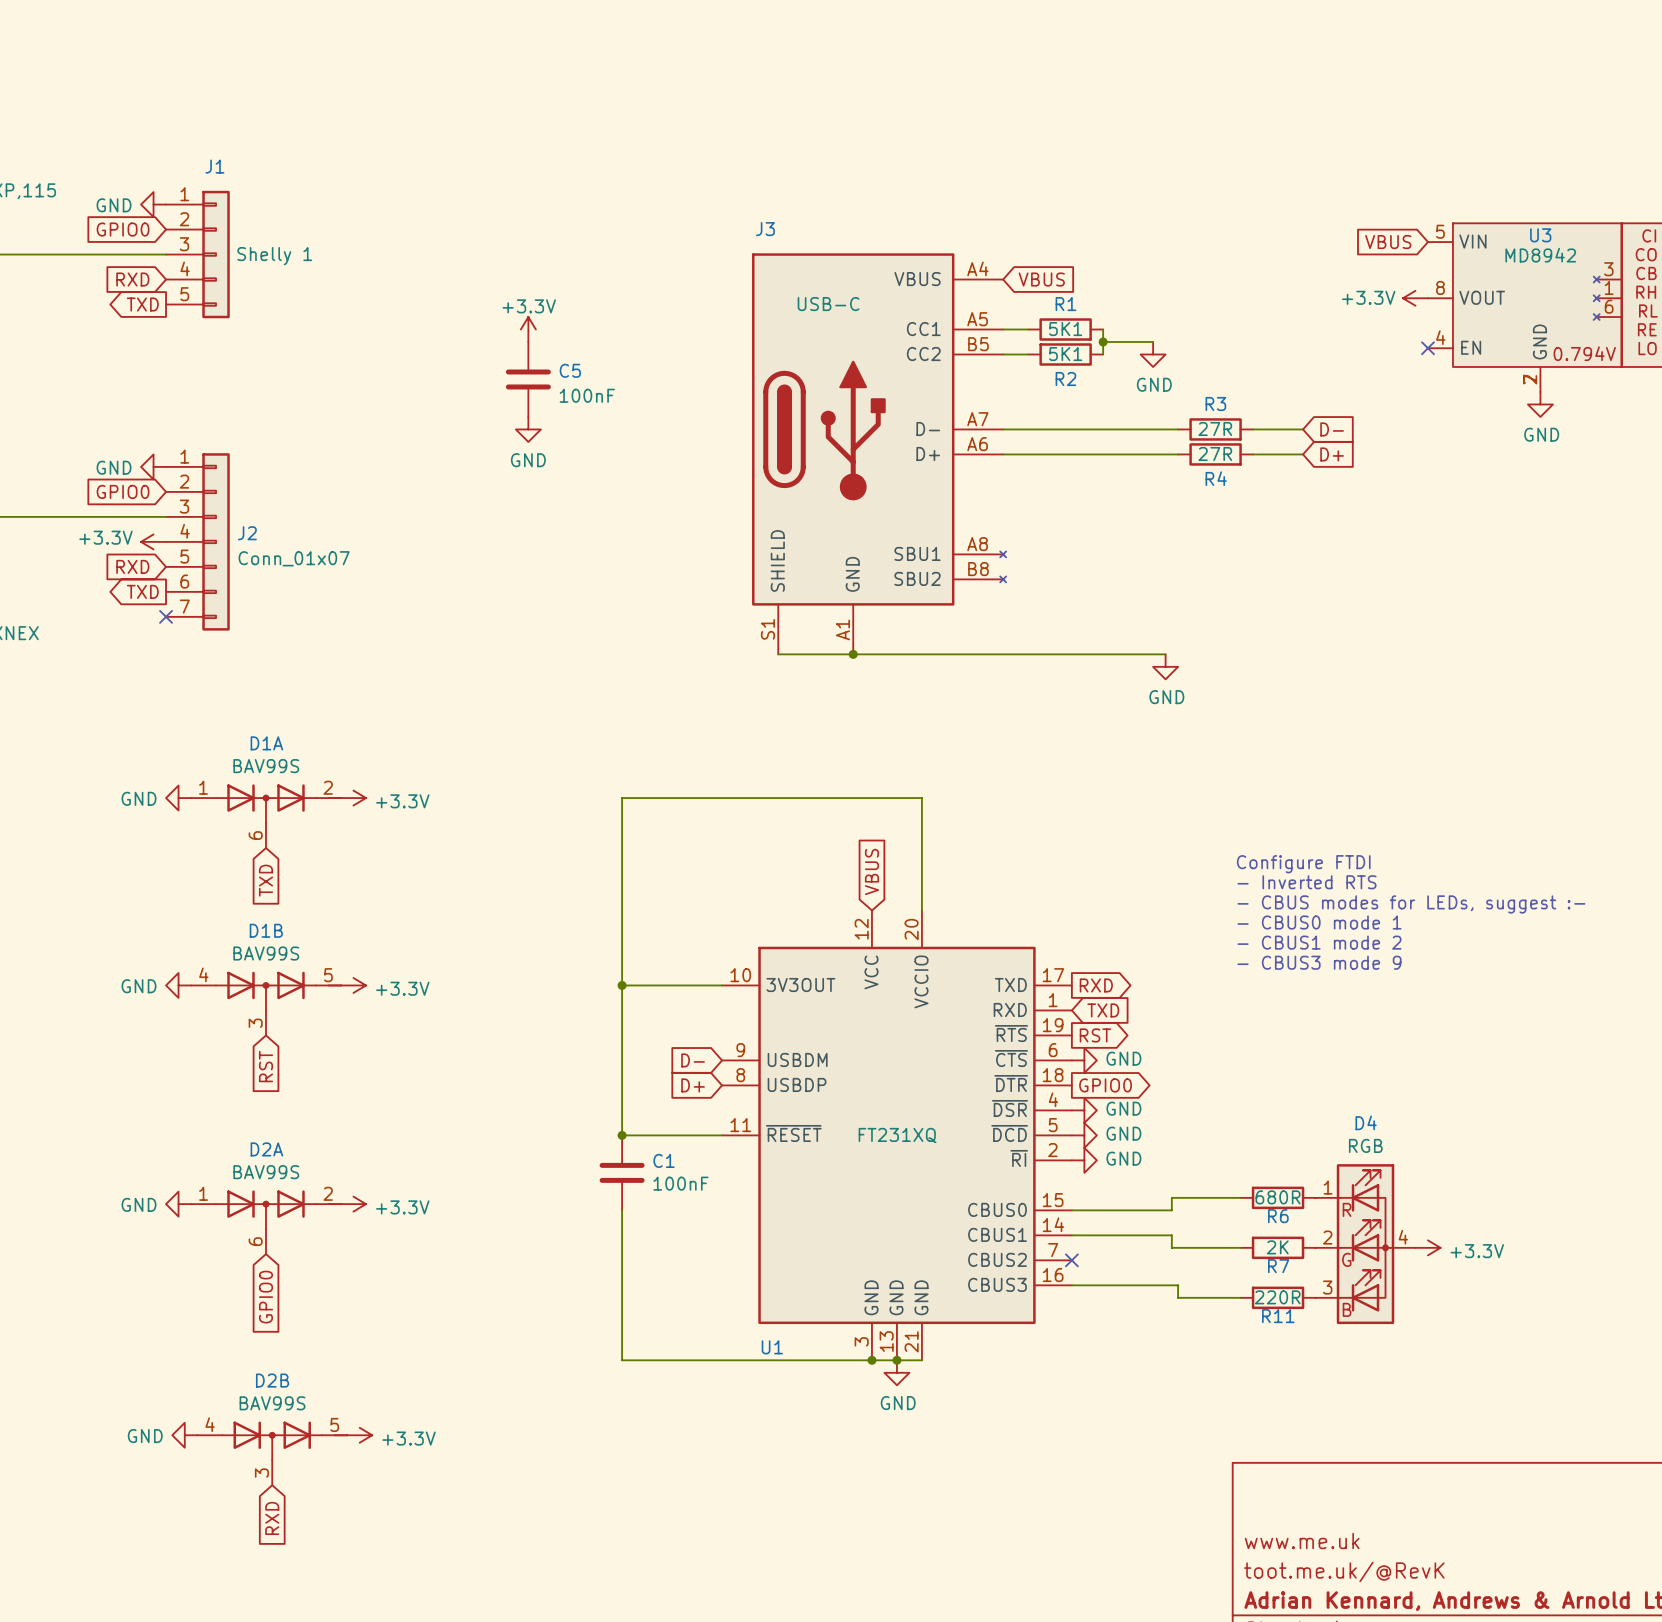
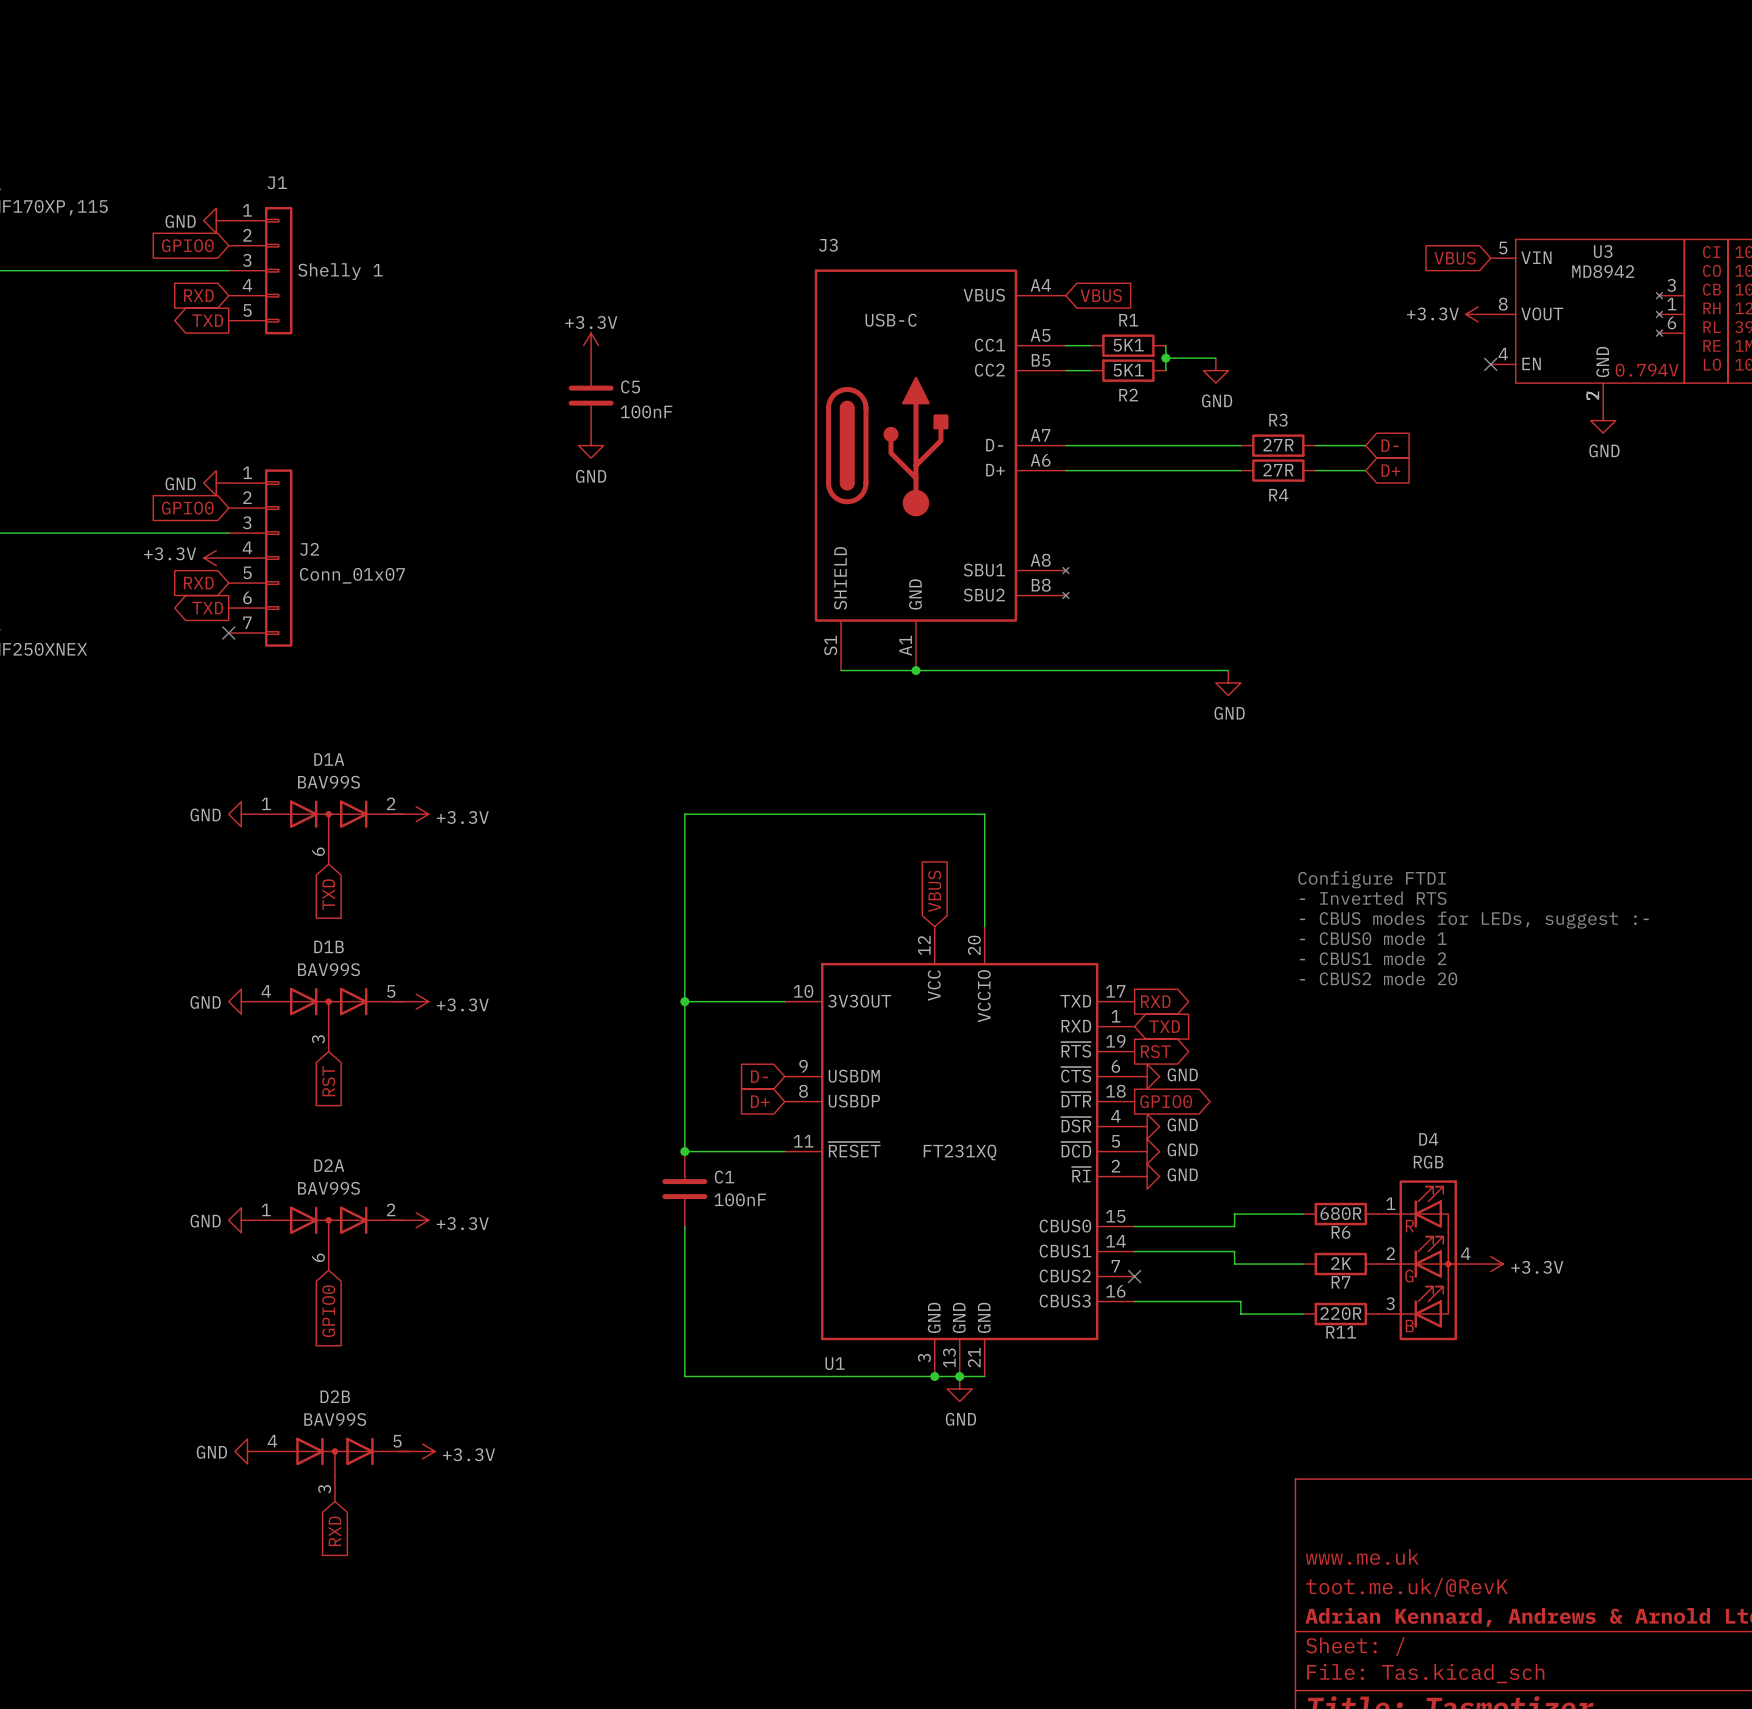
text: - CBUS3 mode 9 (1319, 962) -> - CBUS2 mode 20 (1378, 978)

